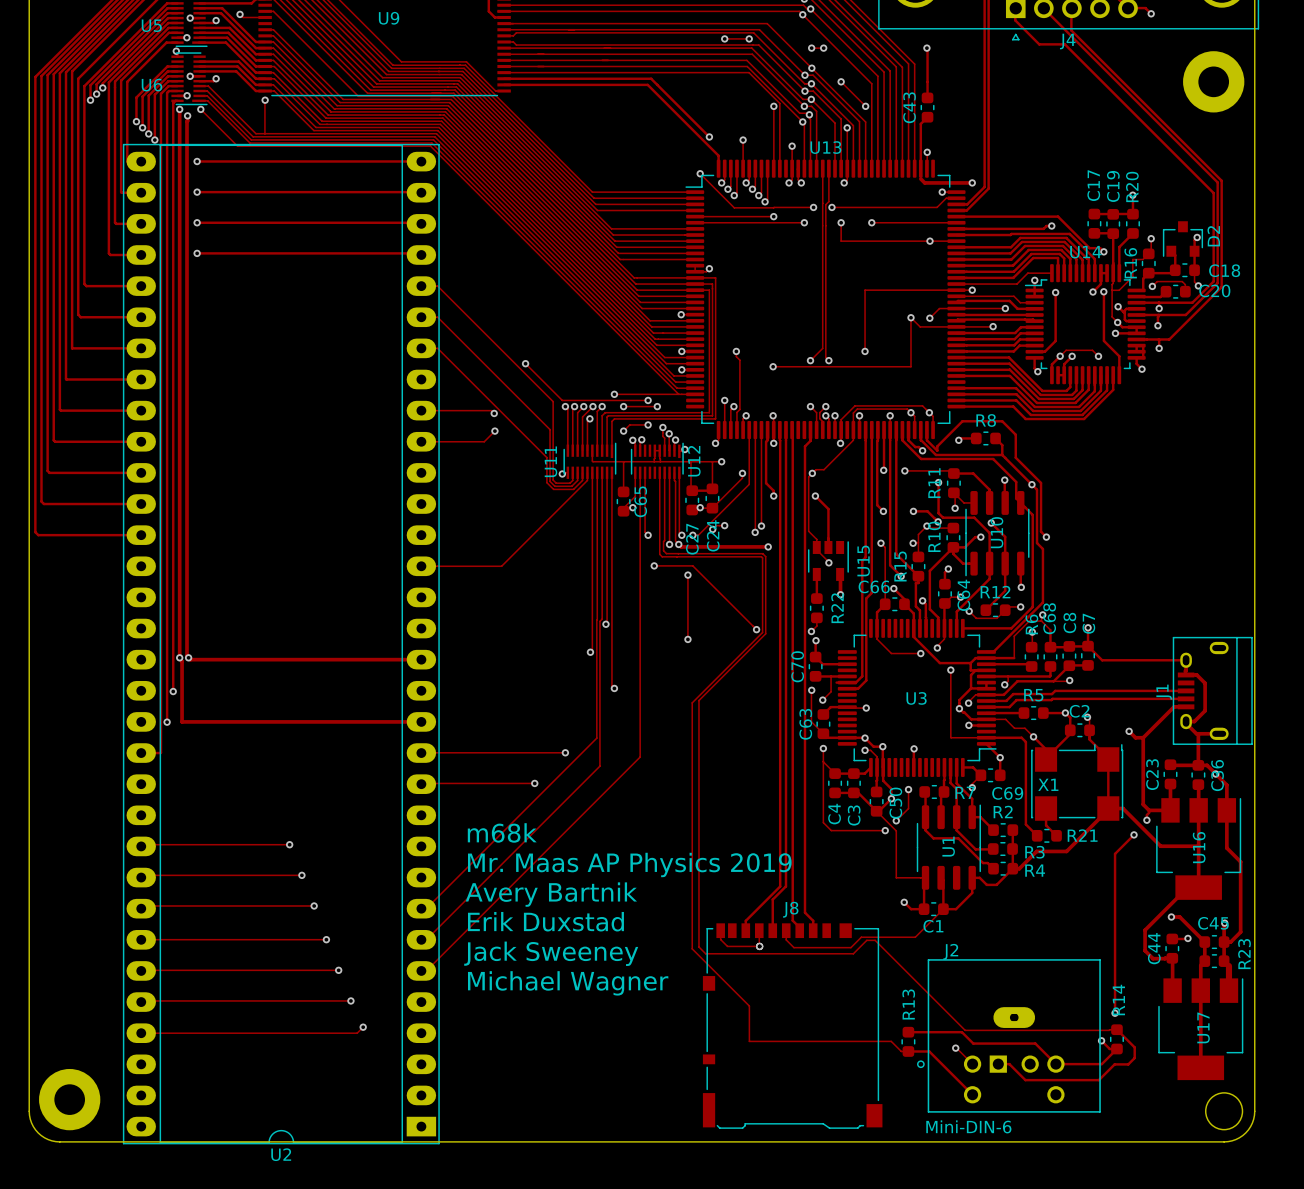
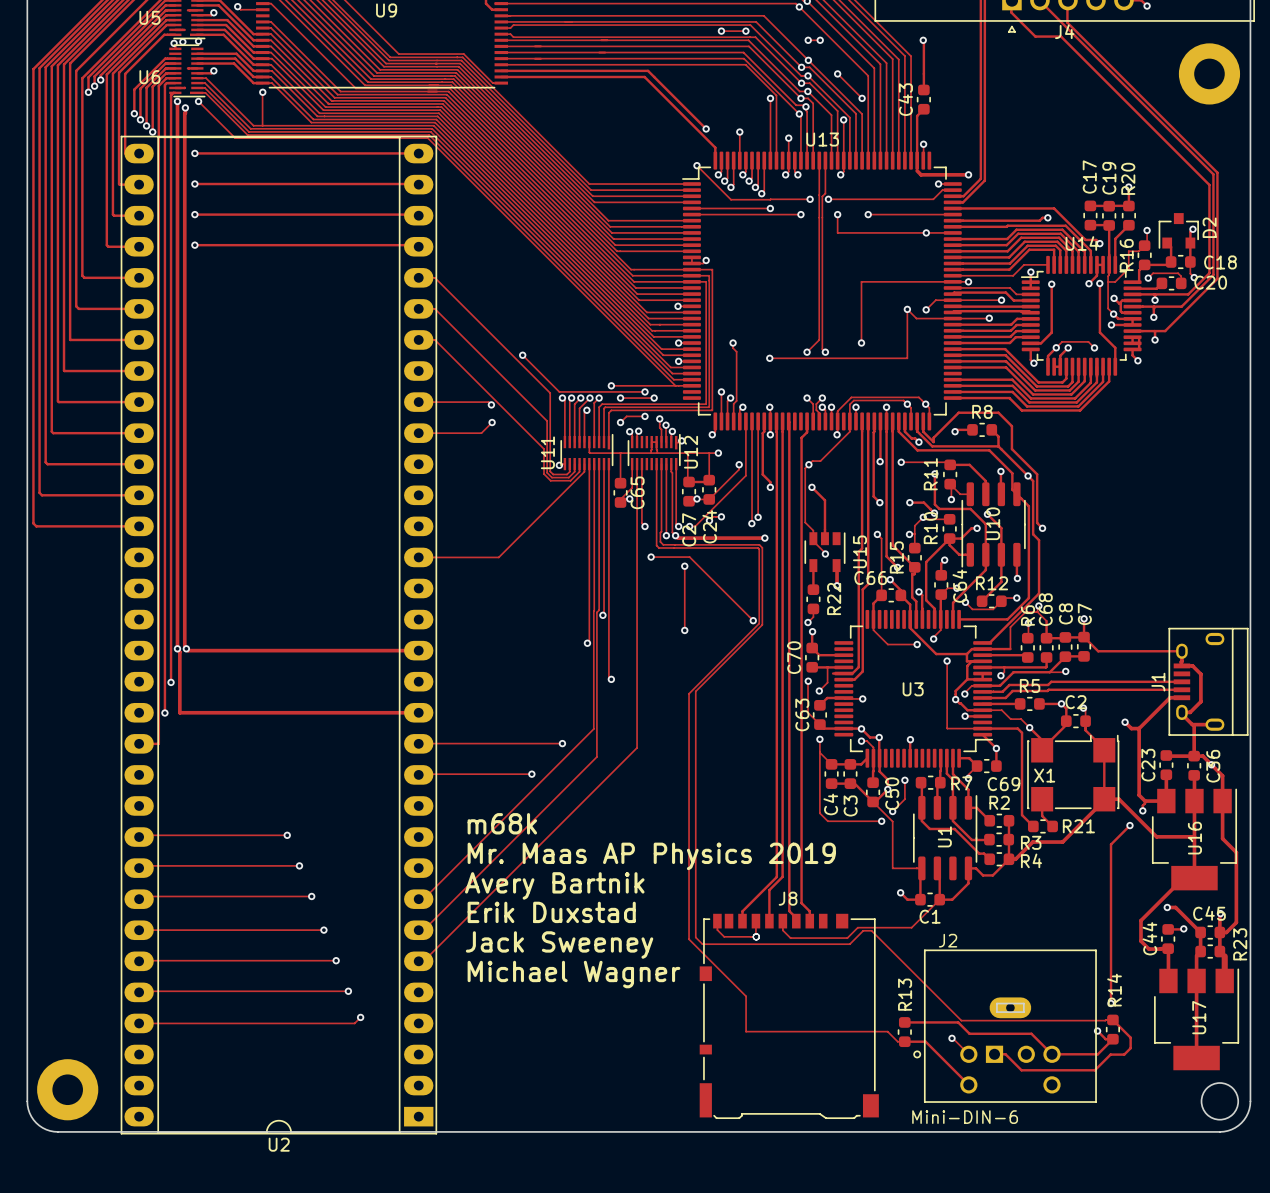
via: (190, 18) -> none
via: (186, 37) -> none
via: none -> (182, 41)
via: none -> (198, 41)
via: (190, 76) -> none
via: (187, 95) -> none

